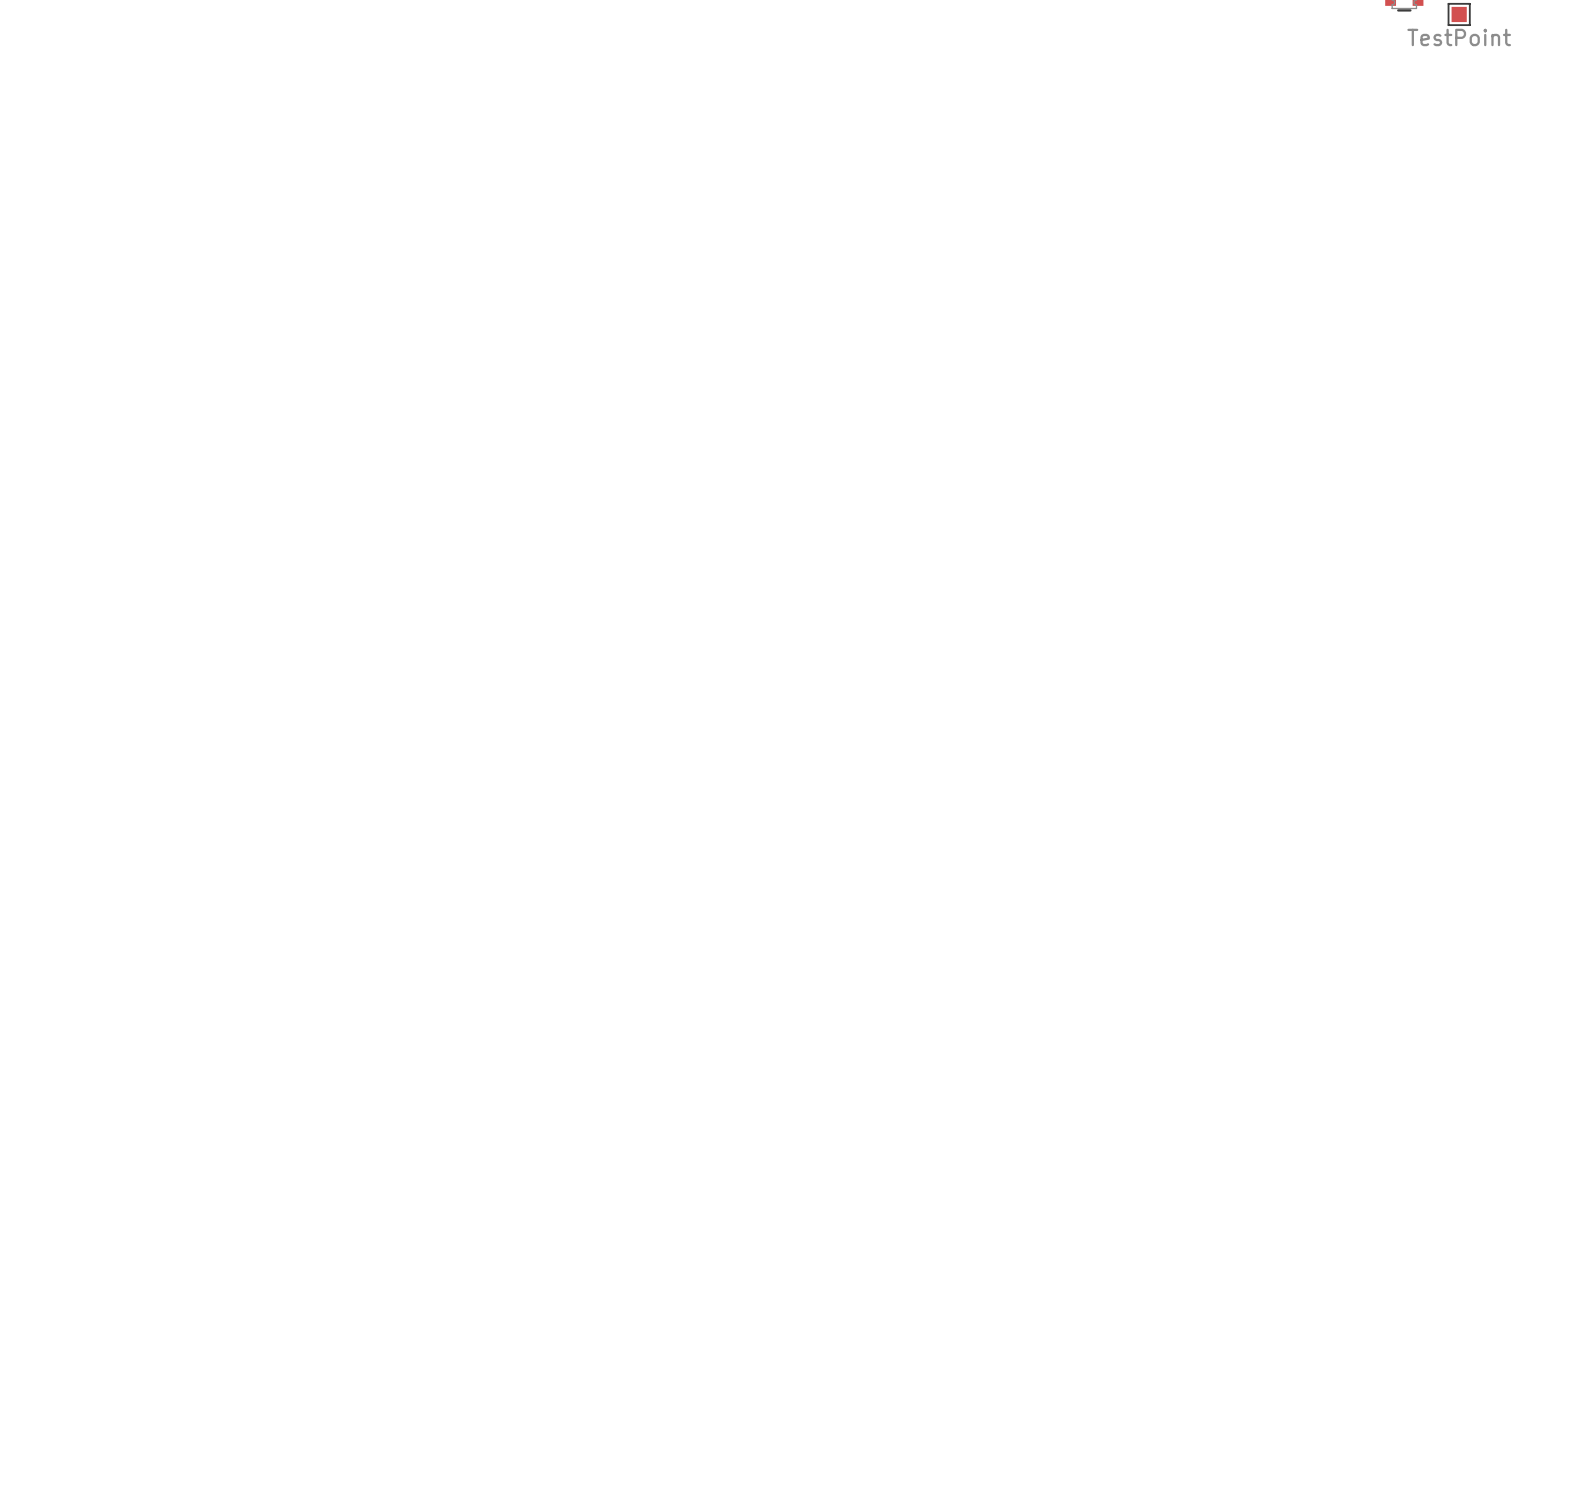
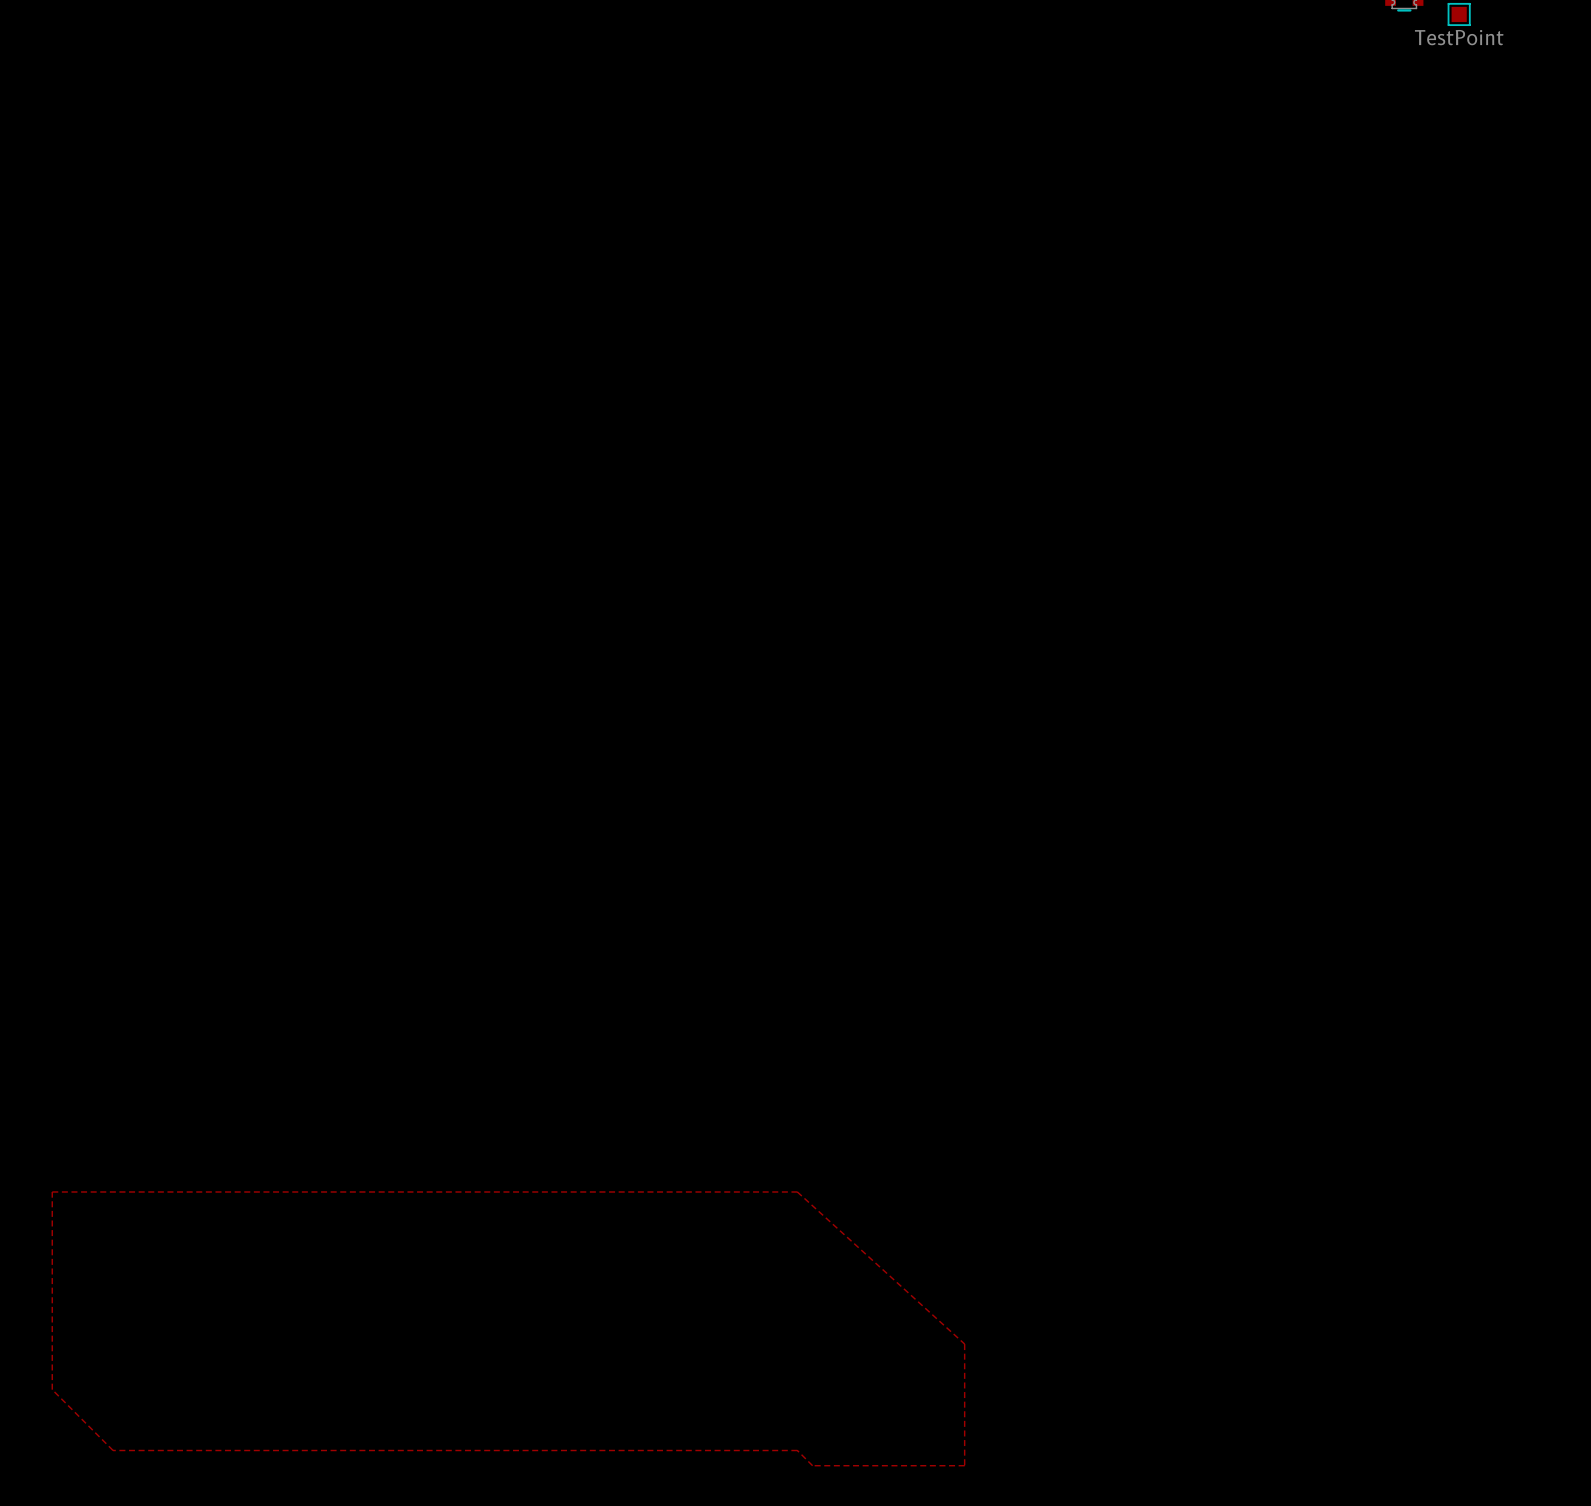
top zone outline: none -> (52, 1191) (52, 1389) (113, 1450) (797, 1450) (812, 1465) (964, 1465) (964, 1344) (797, 1191) (52, 1191)

